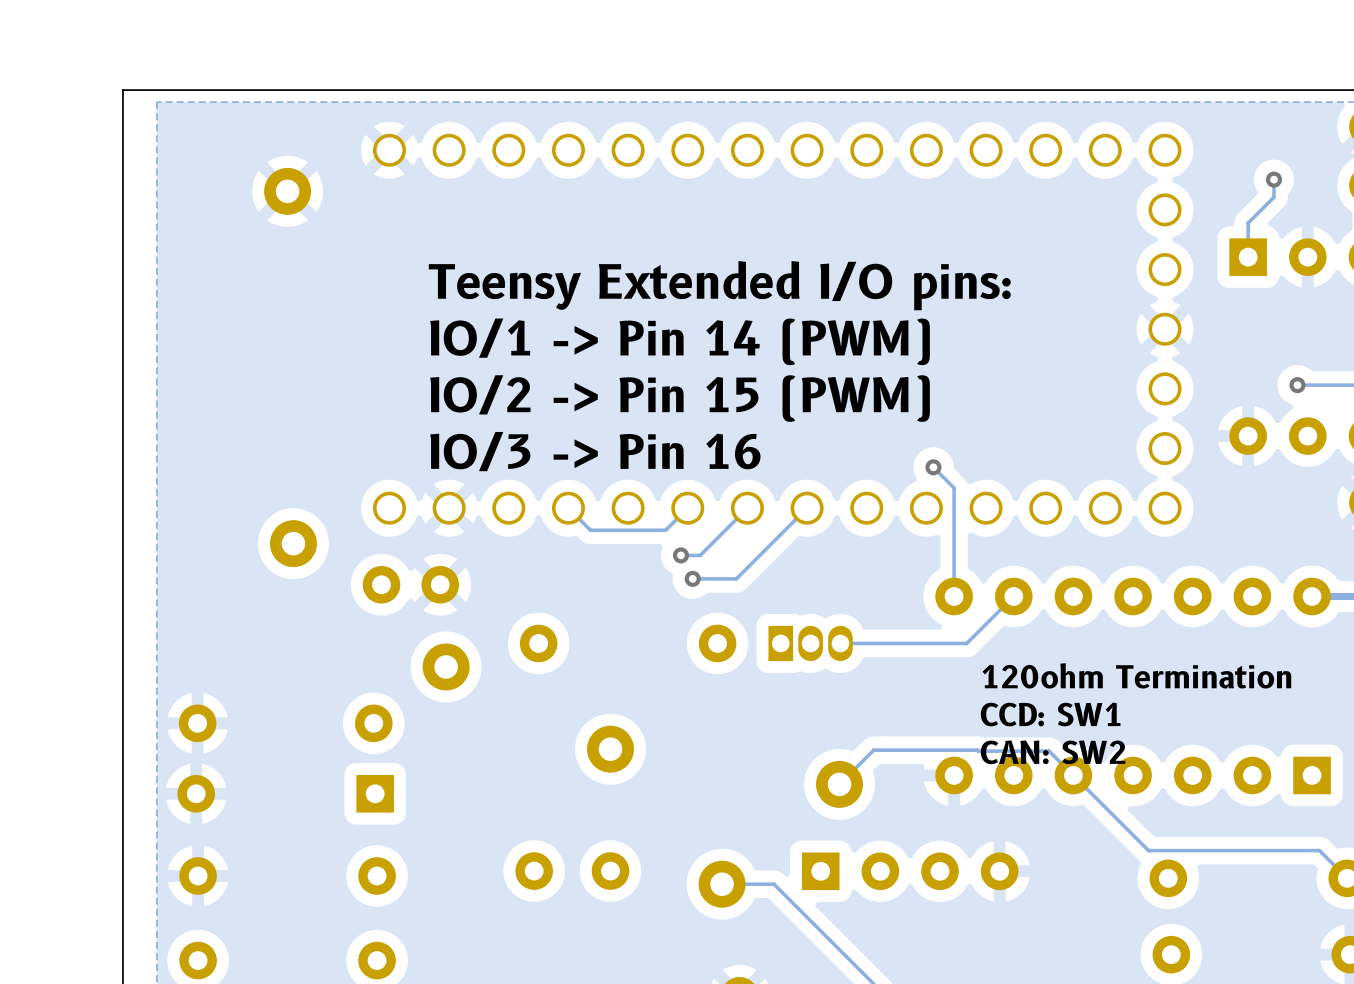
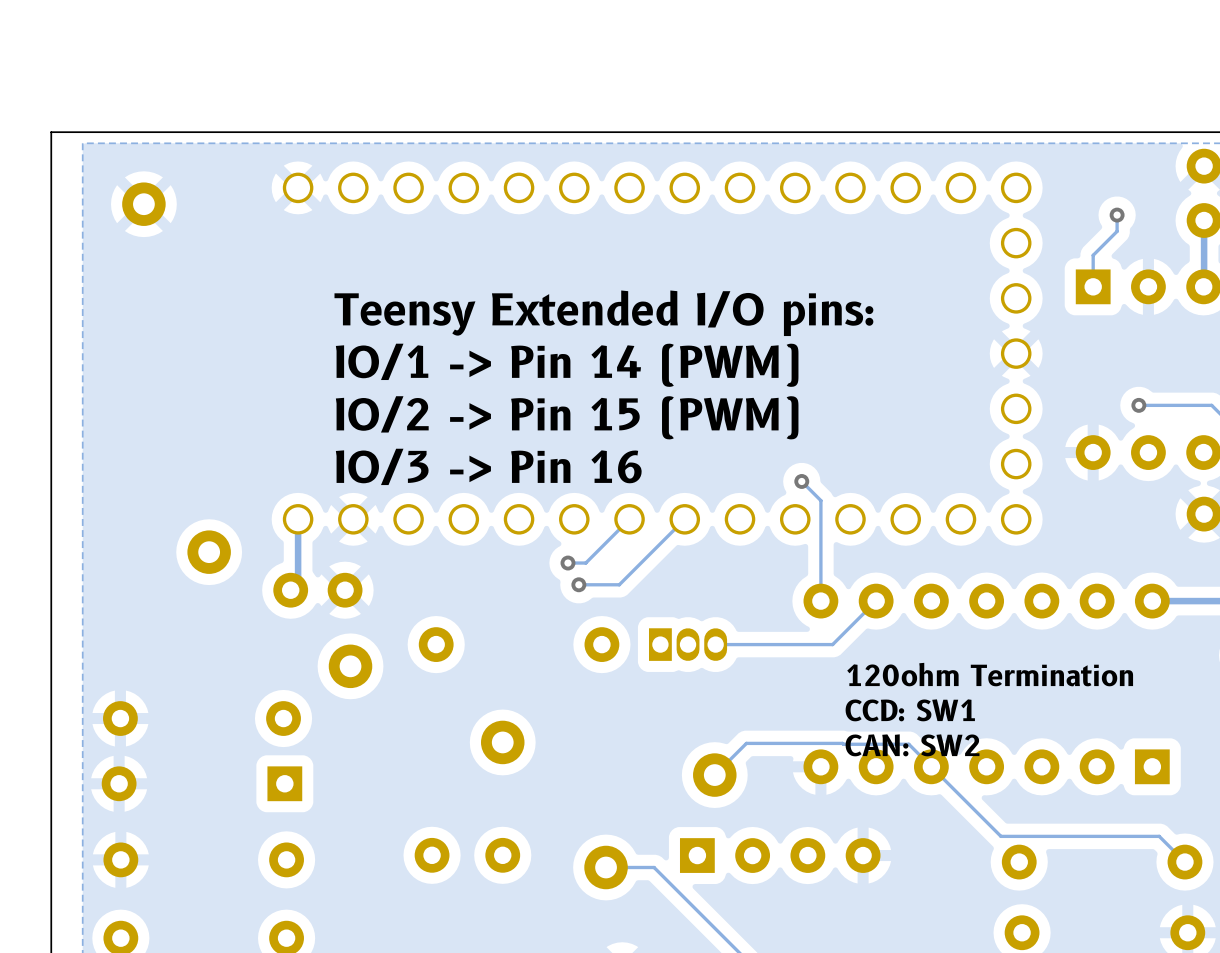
part position: (287, 191) -> (143, 204)
track: none -> (298, 519) (298, 582)
track: (687, 508) (665, 530) (590, 530) (568, 508) -> none

